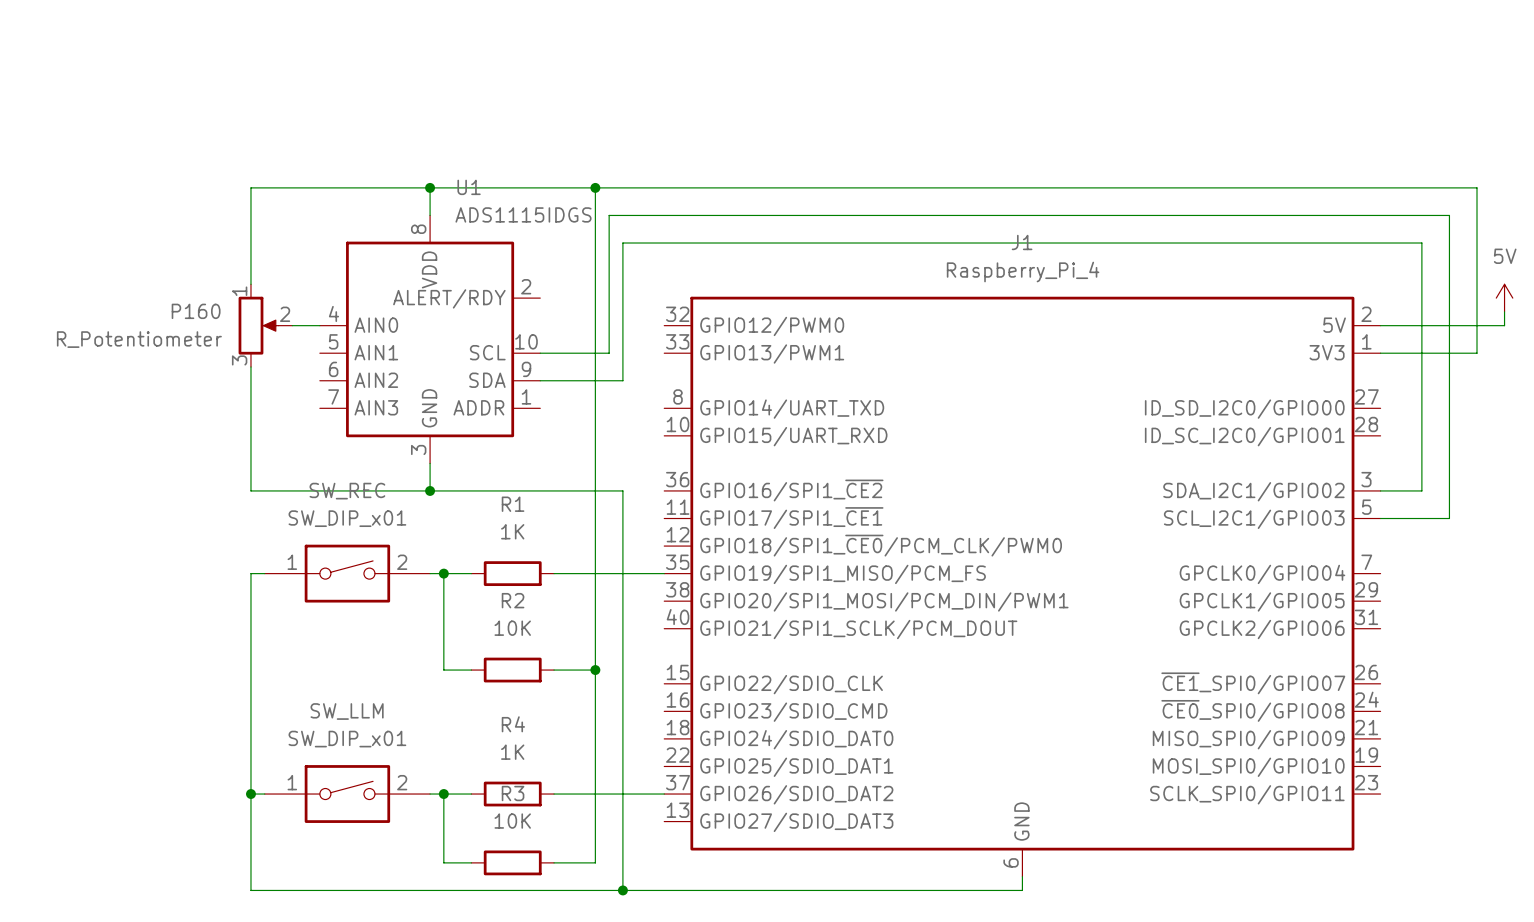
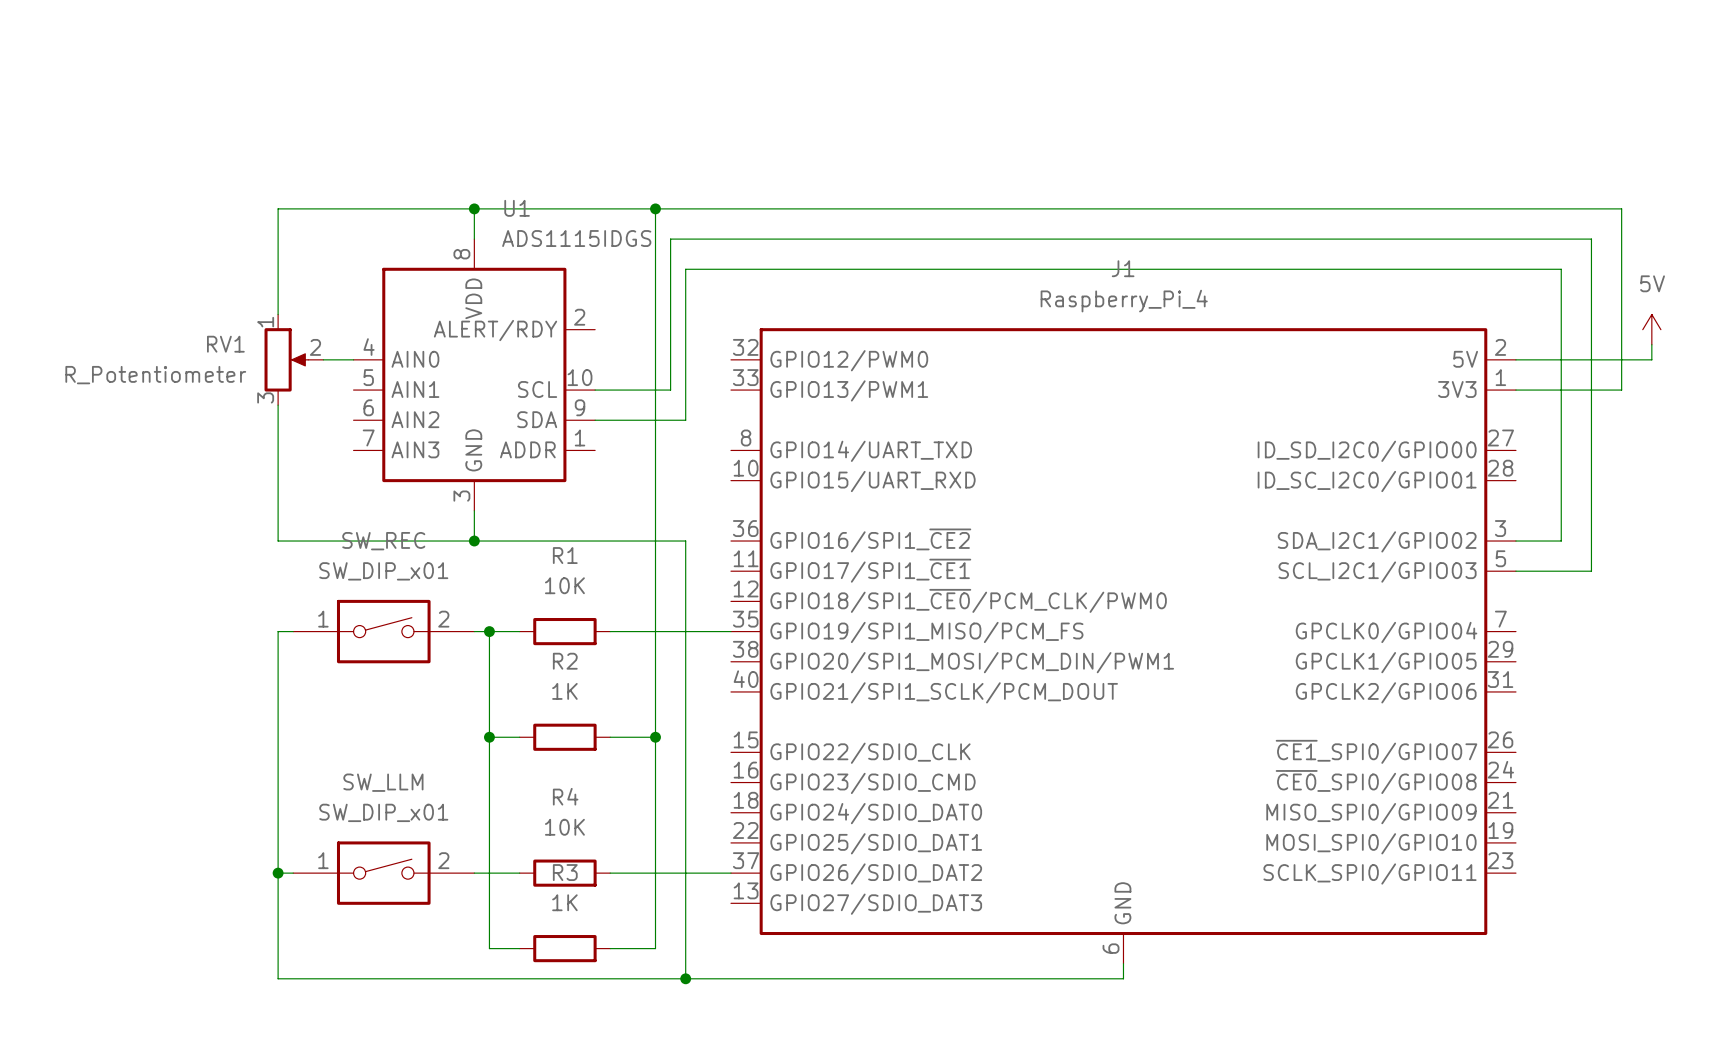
P160 name: P160 (196, 311) -> RV1 (225, 344)
R1 value: 1K (512, 531) -> 10K (564, 585)
R2 value: 10K (512, 628) -> 1K (564, 691)
wire: none -> (489, 737) (489, 873)
junction: none -> (489, 737)
R4 value: 1K (512, 752) -> 10K (564, 827)
junction: (443, 794) -> none
R3 value: 10K (512, 821) -> 1K (564, 902)

